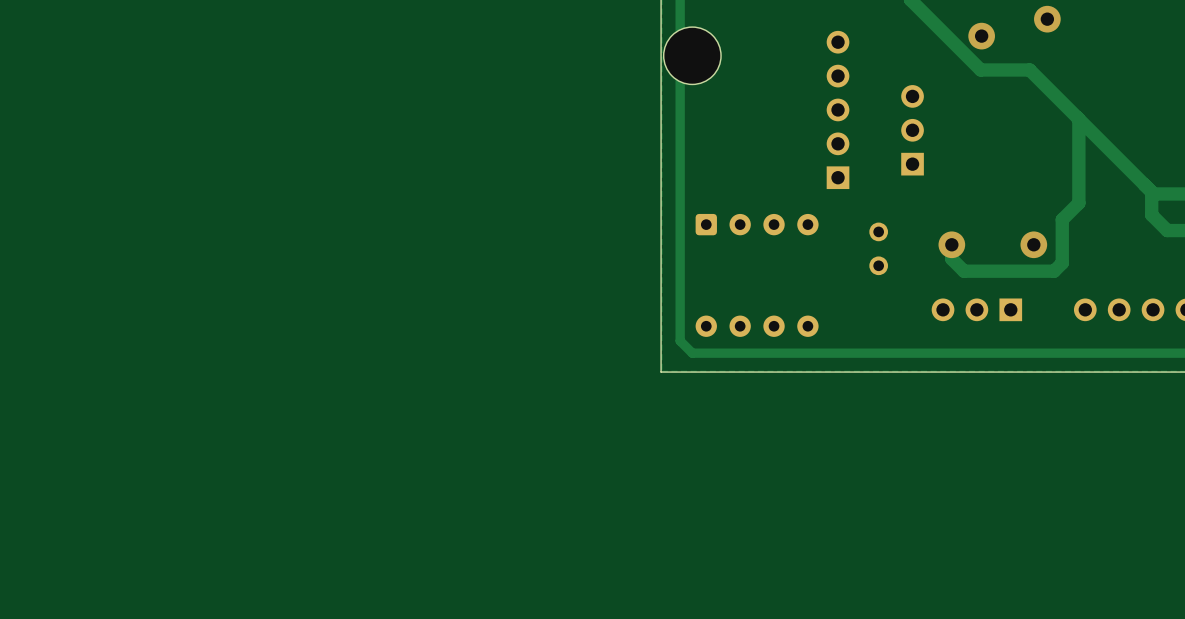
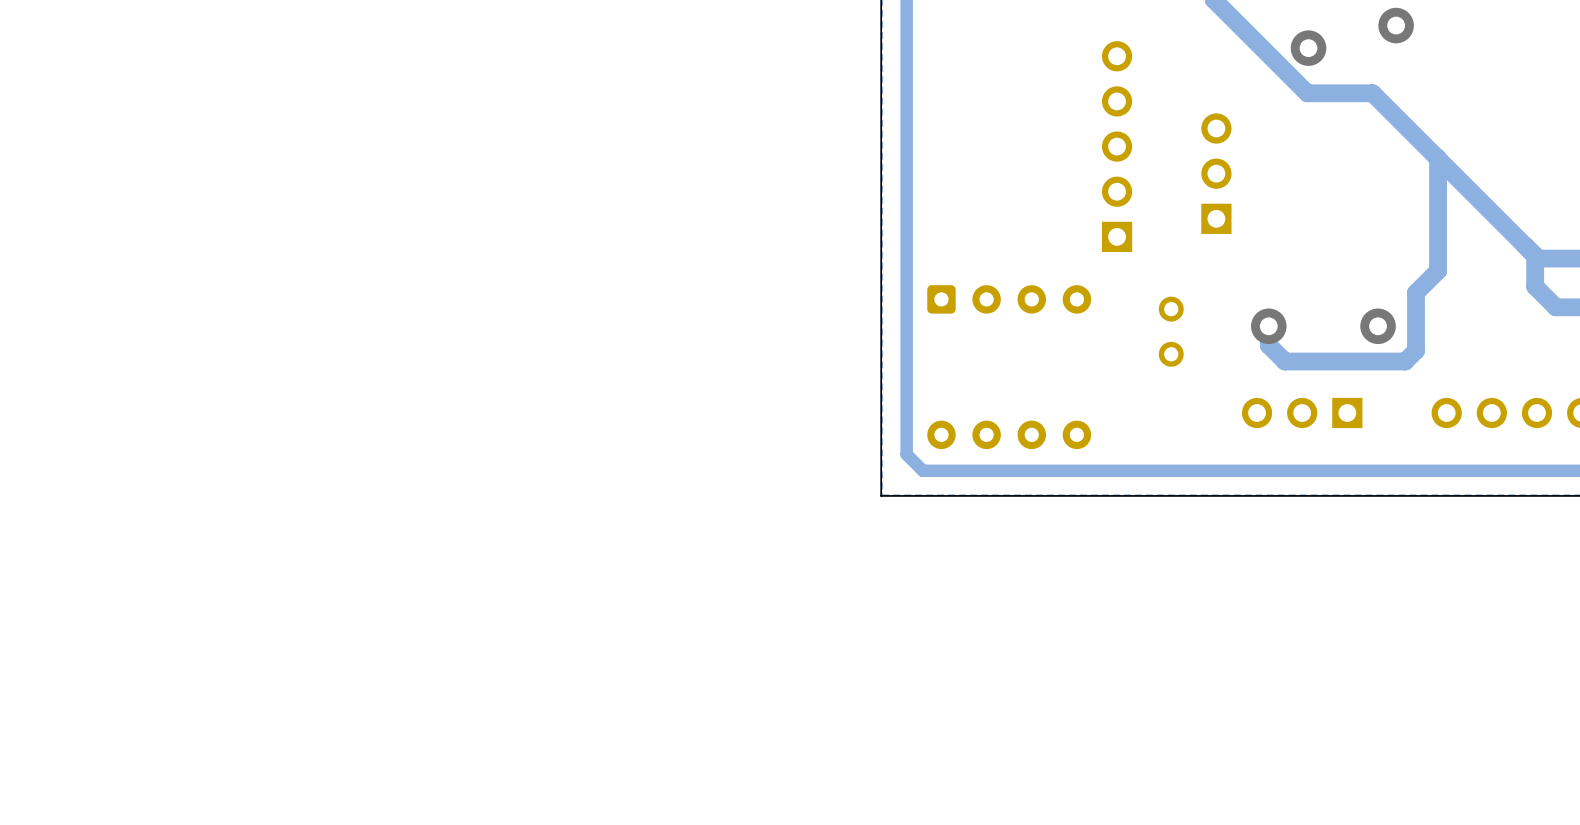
part: (692, 55) -> none

